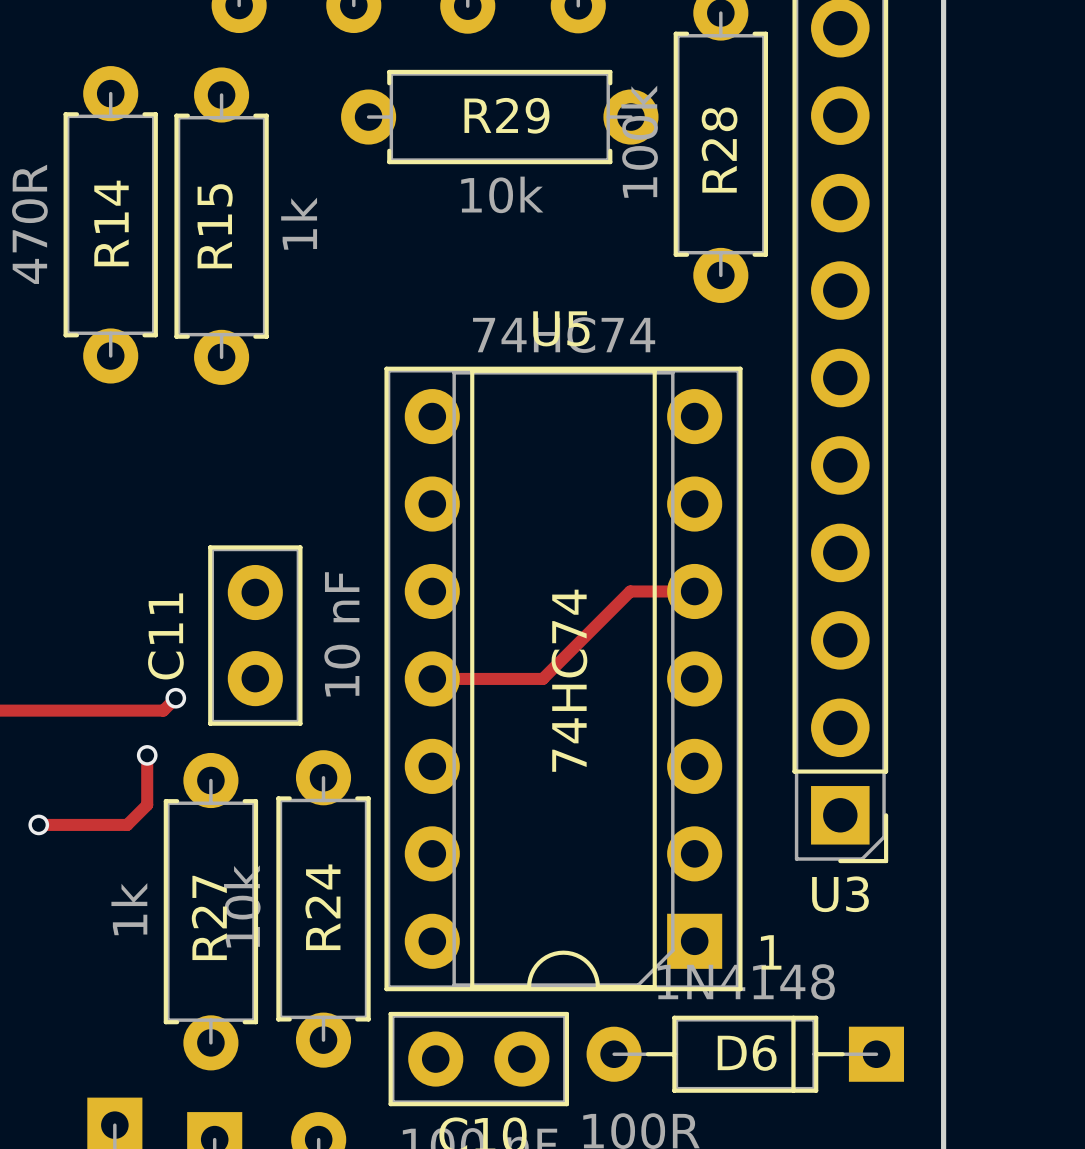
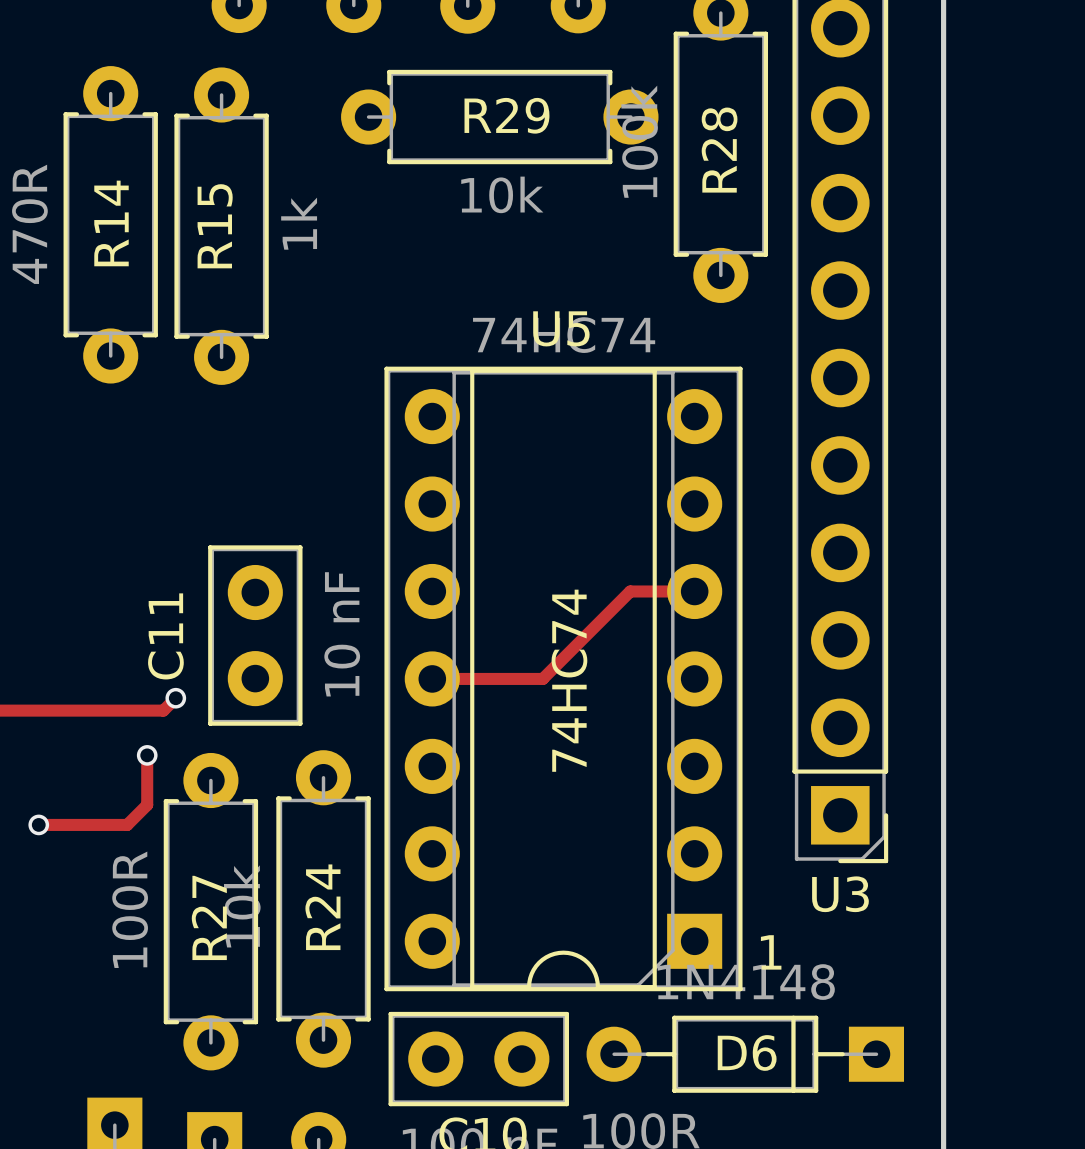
R27 value: 1k (129, 909) -> 100R (130, 909)

